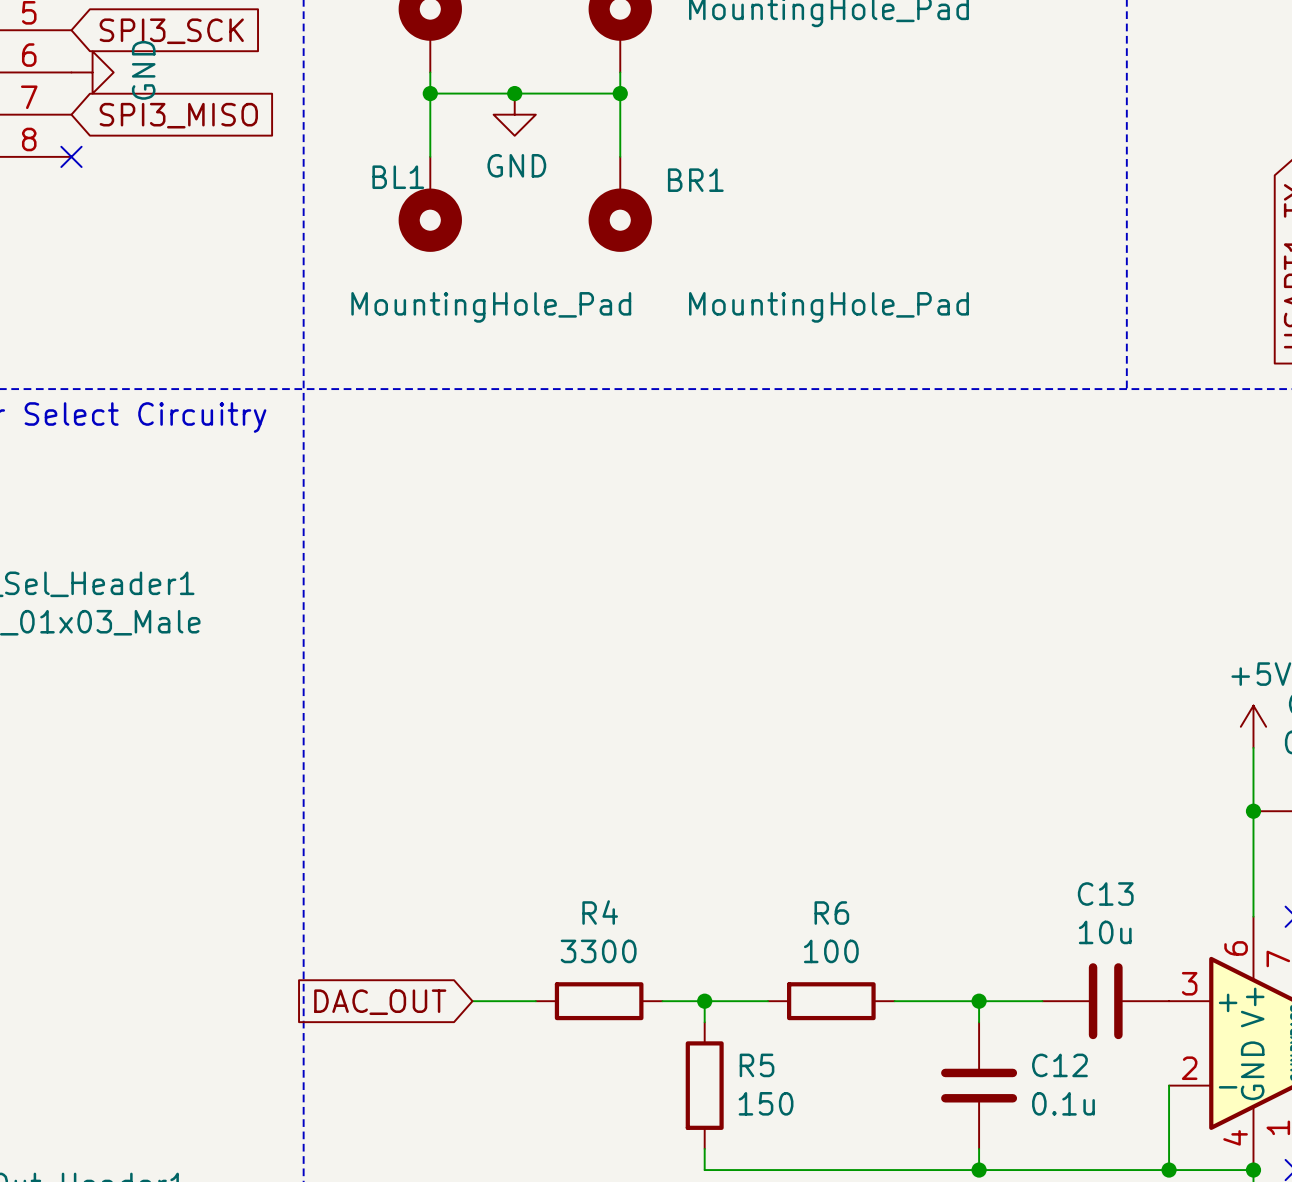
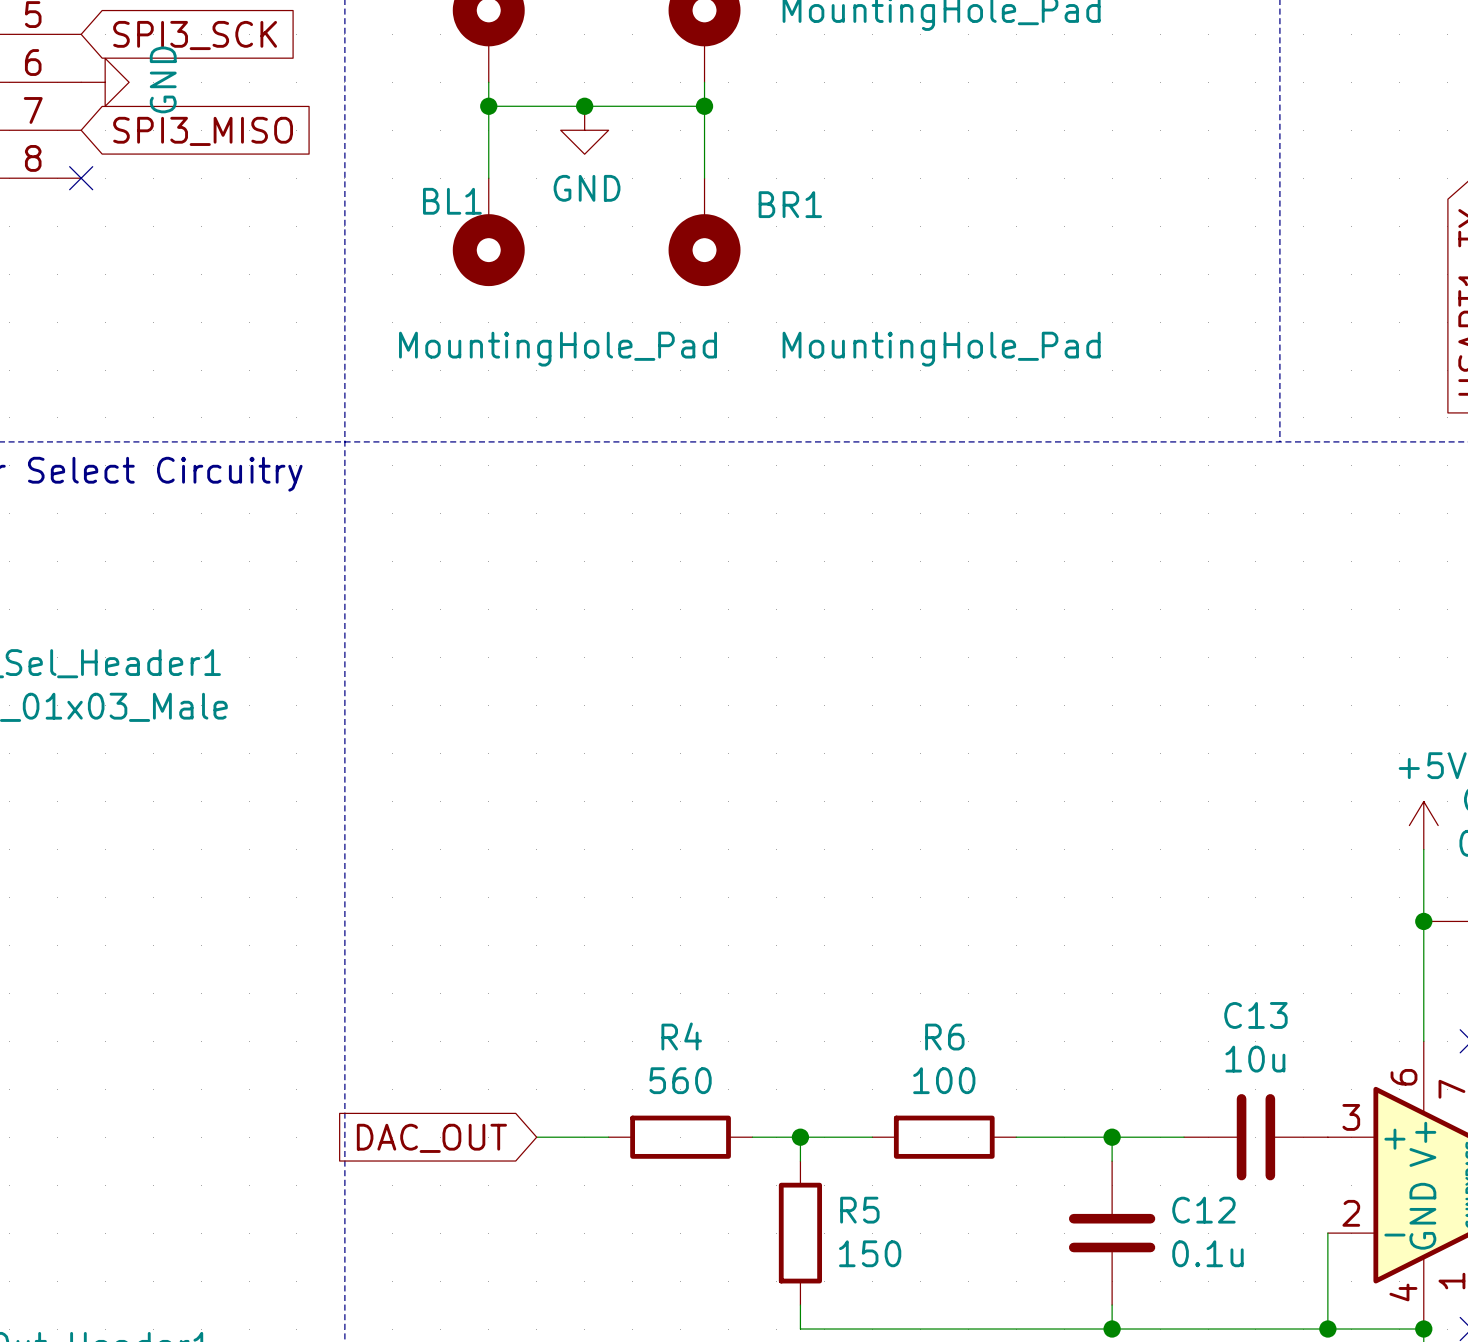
R4 value: 3300 (598, 951) -> 560 (680, 1080)

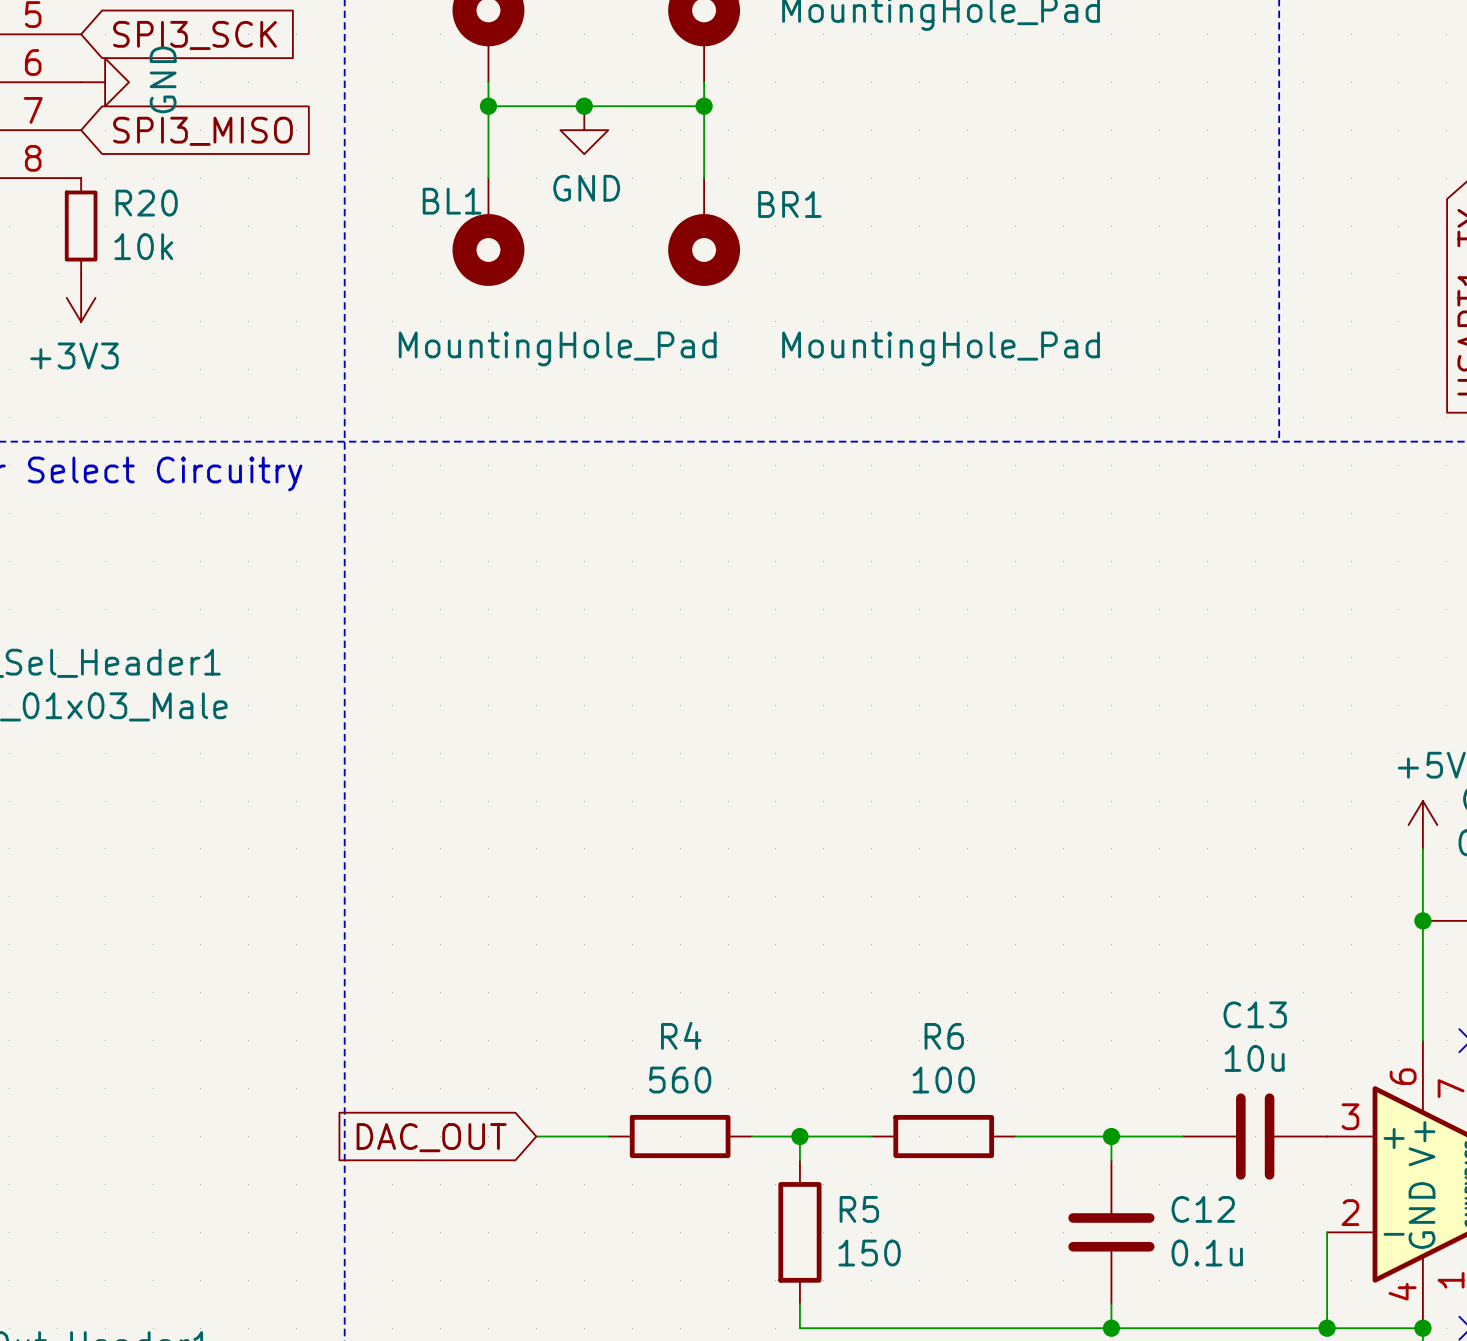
no-connect mark: (81, 178) -> none
R20: none -> 10k (81, 226)
power symbol: none -> +3V3 (81, 297)

